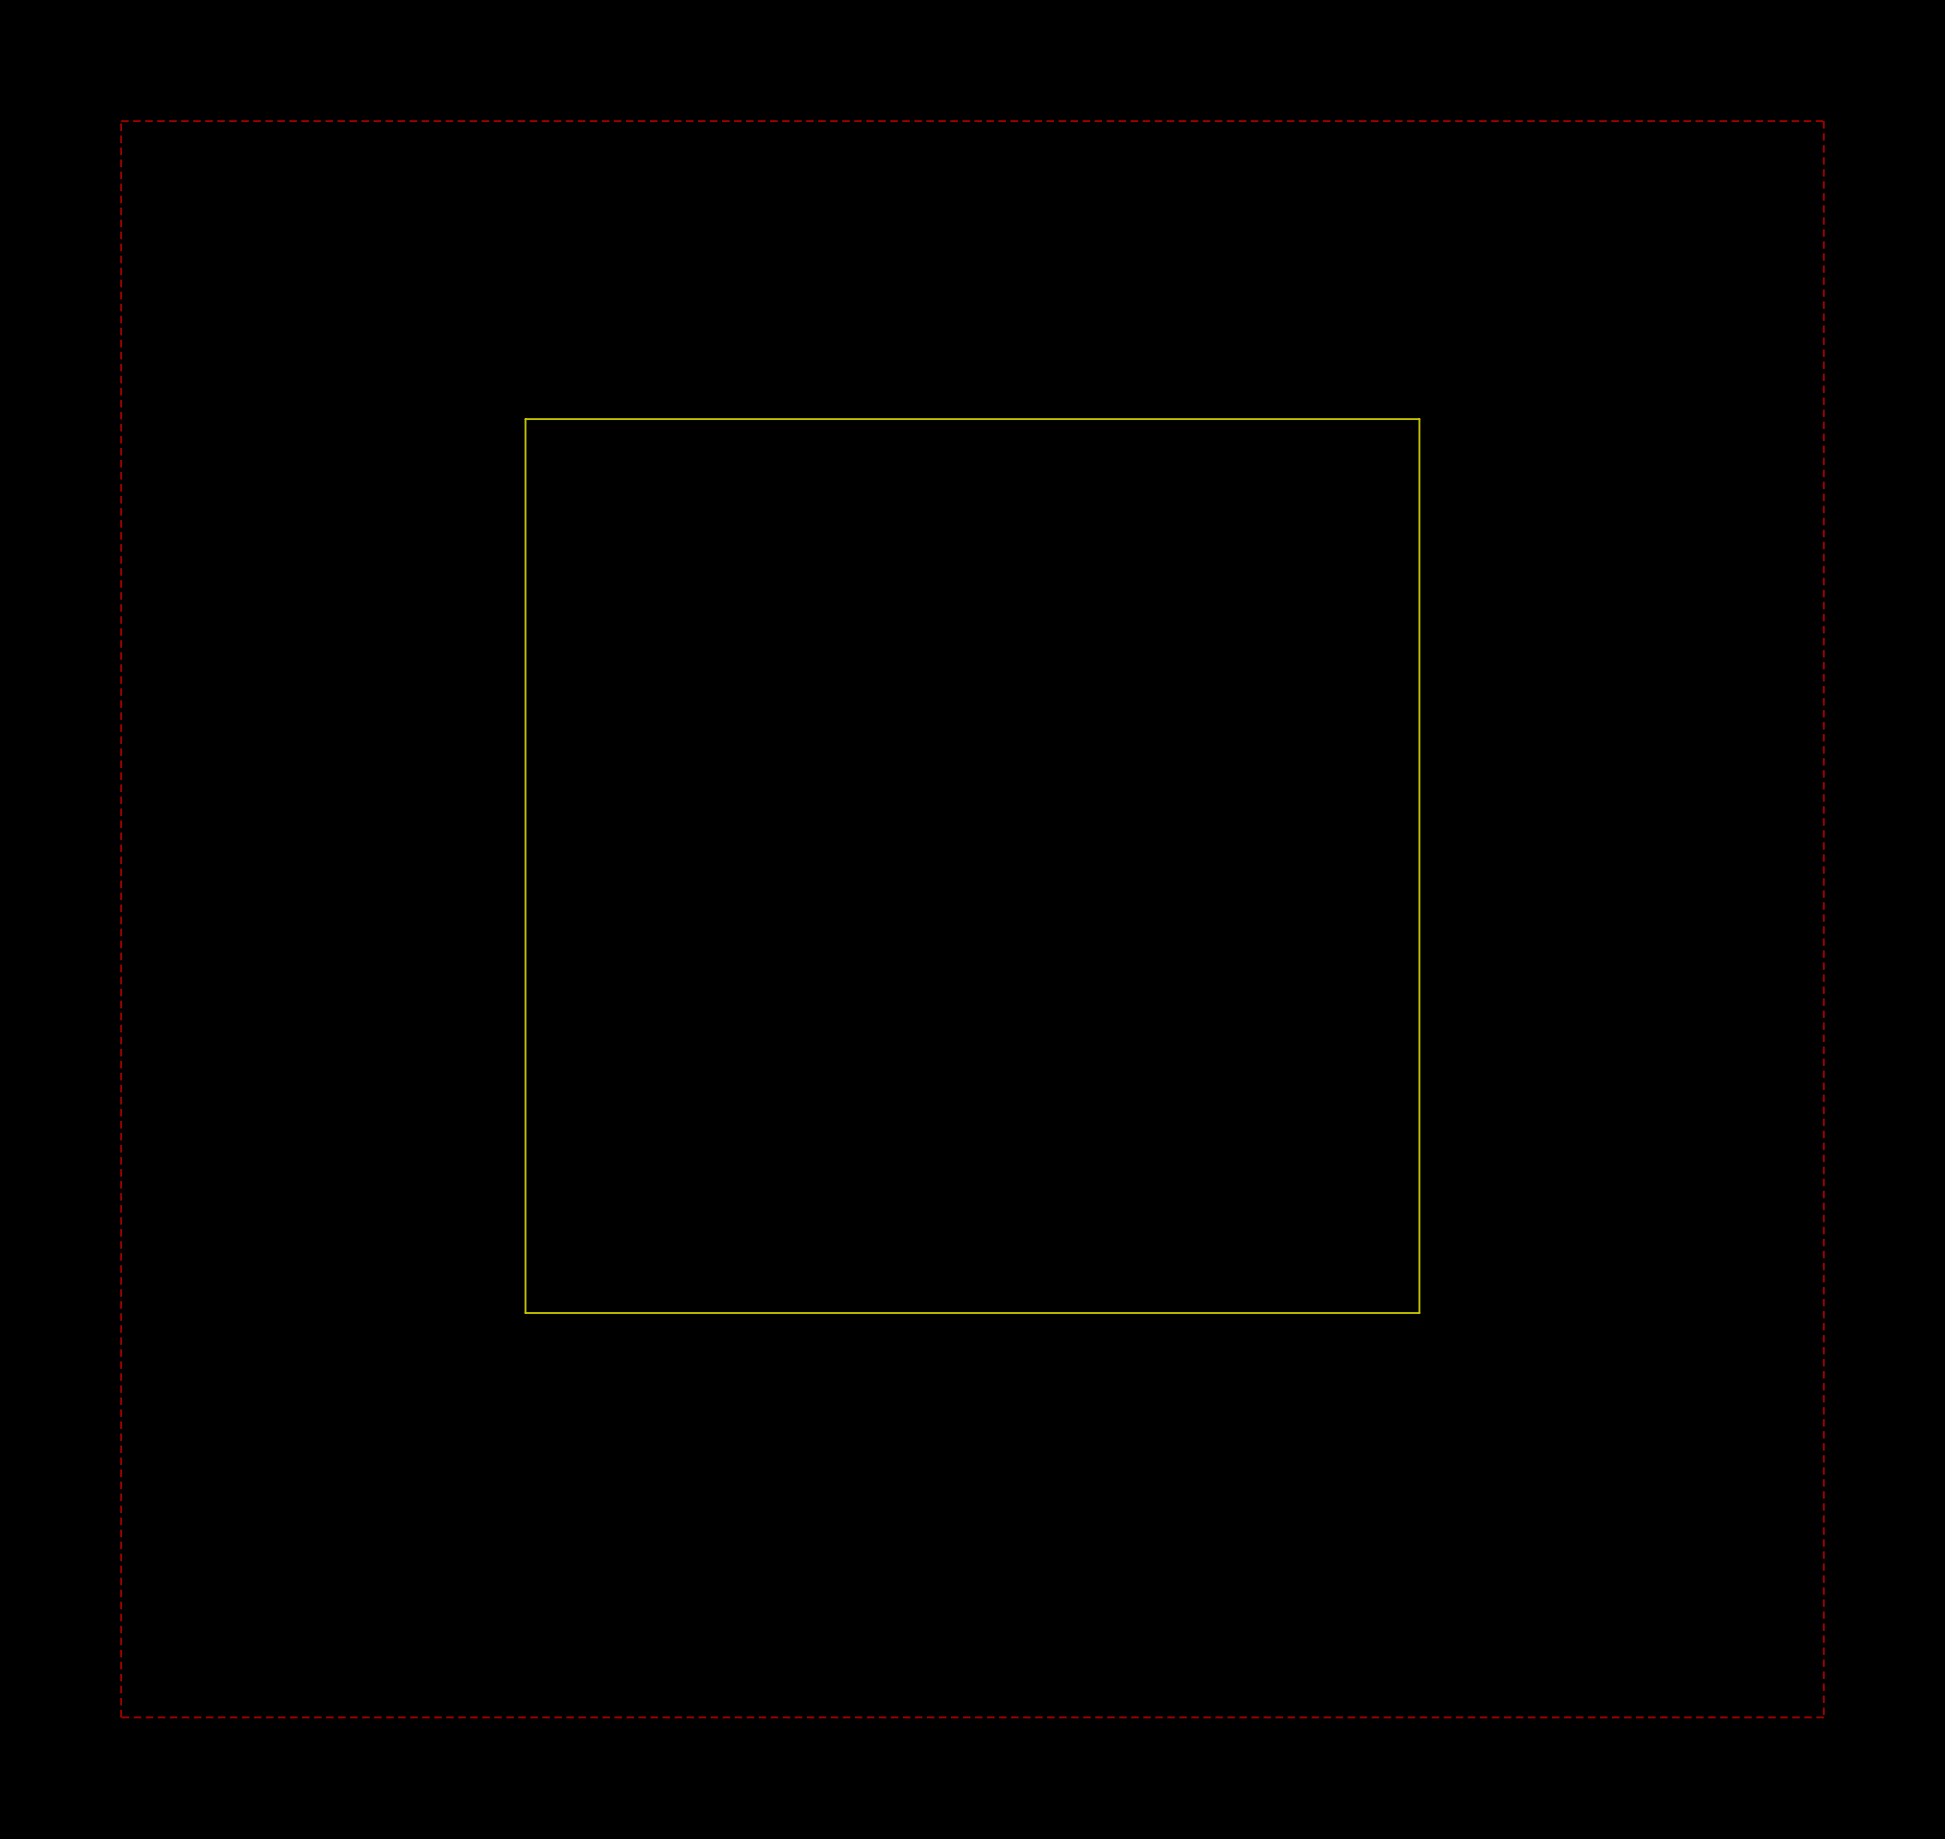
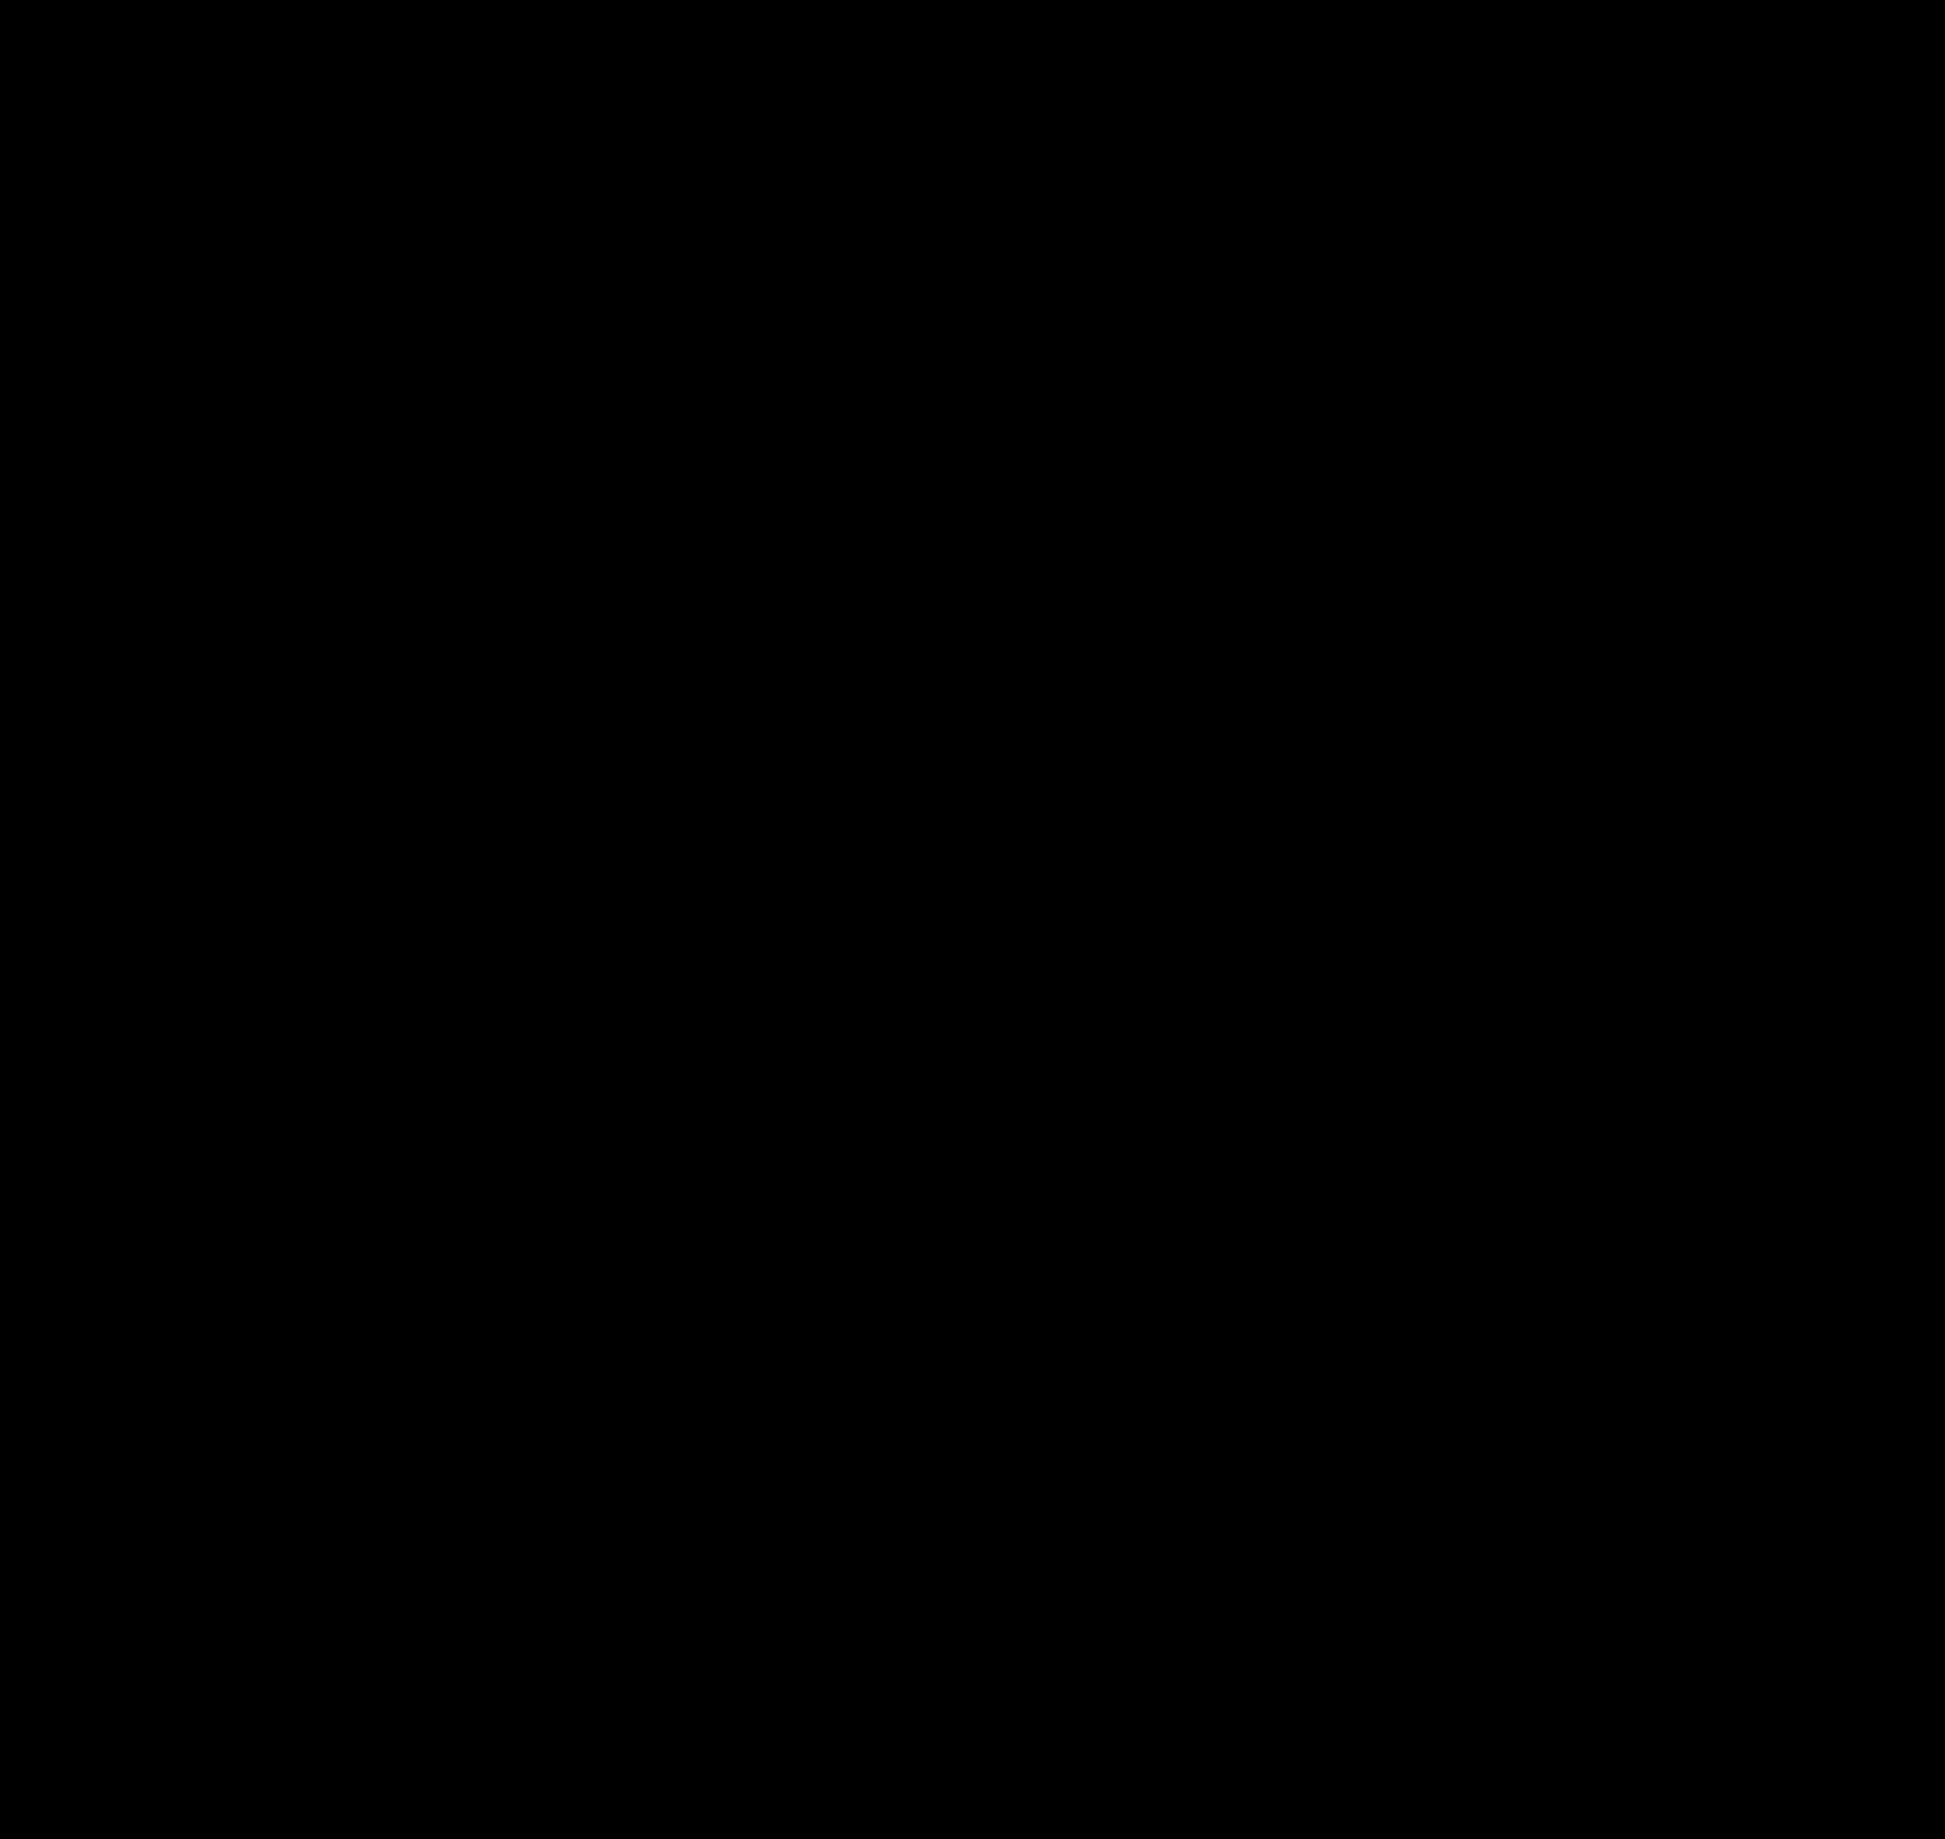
zone outline: (121, 121) (1823, 121) (1823, 1717) (121, 1717) (121, 121) -> none
board edge: (525, 419) (1419, 419) (1419, 1313) (525, 1313) (525, 419) -> none

